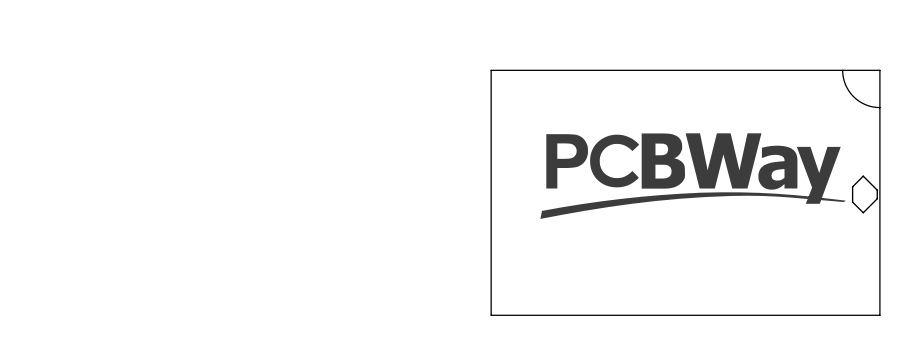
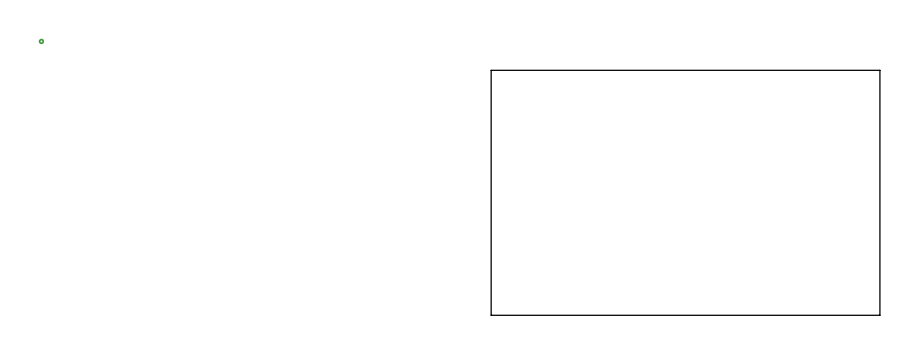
part: none -> (41, 41)
board edge: (842, 70) (845, 84) (853, 96) (865, 104) (879, 107) -> none
drawing: [540, 133, 846, 219] -> none
board edge: (863, 176) (852, 186) (852, 202) (863, 212) (877, 198) (877, 190) (863, 176) -> none

